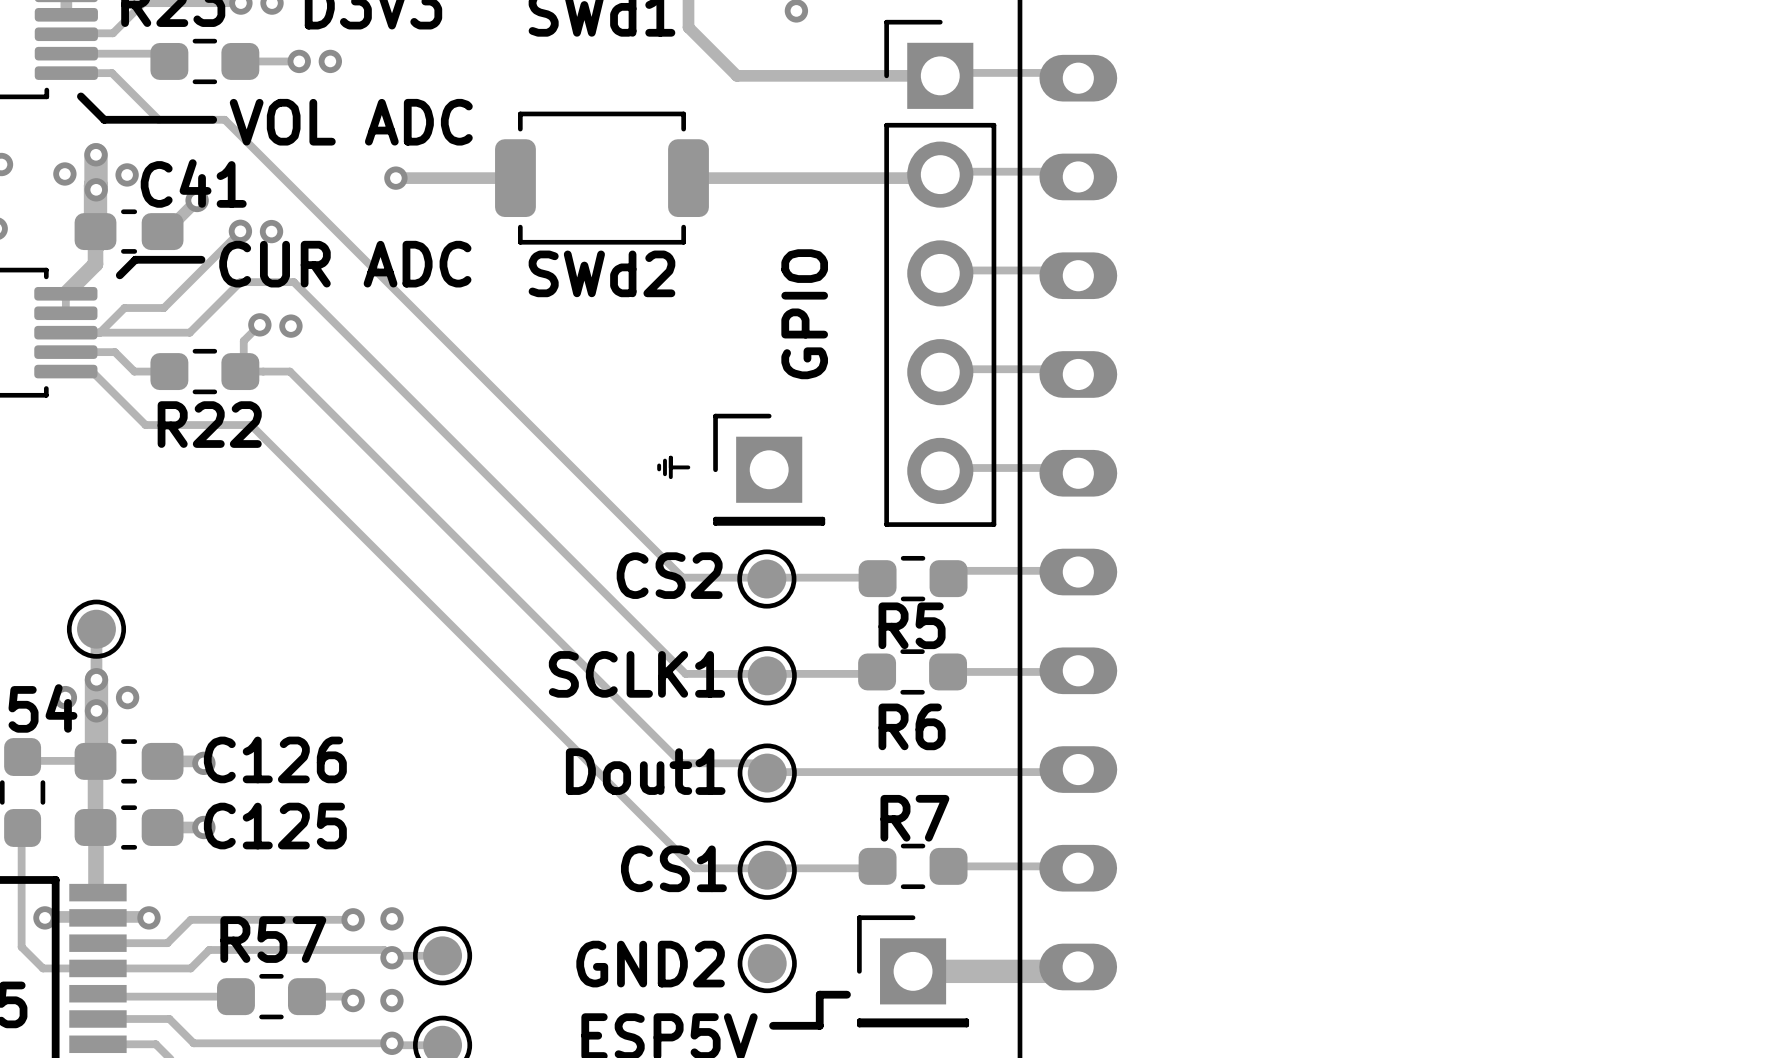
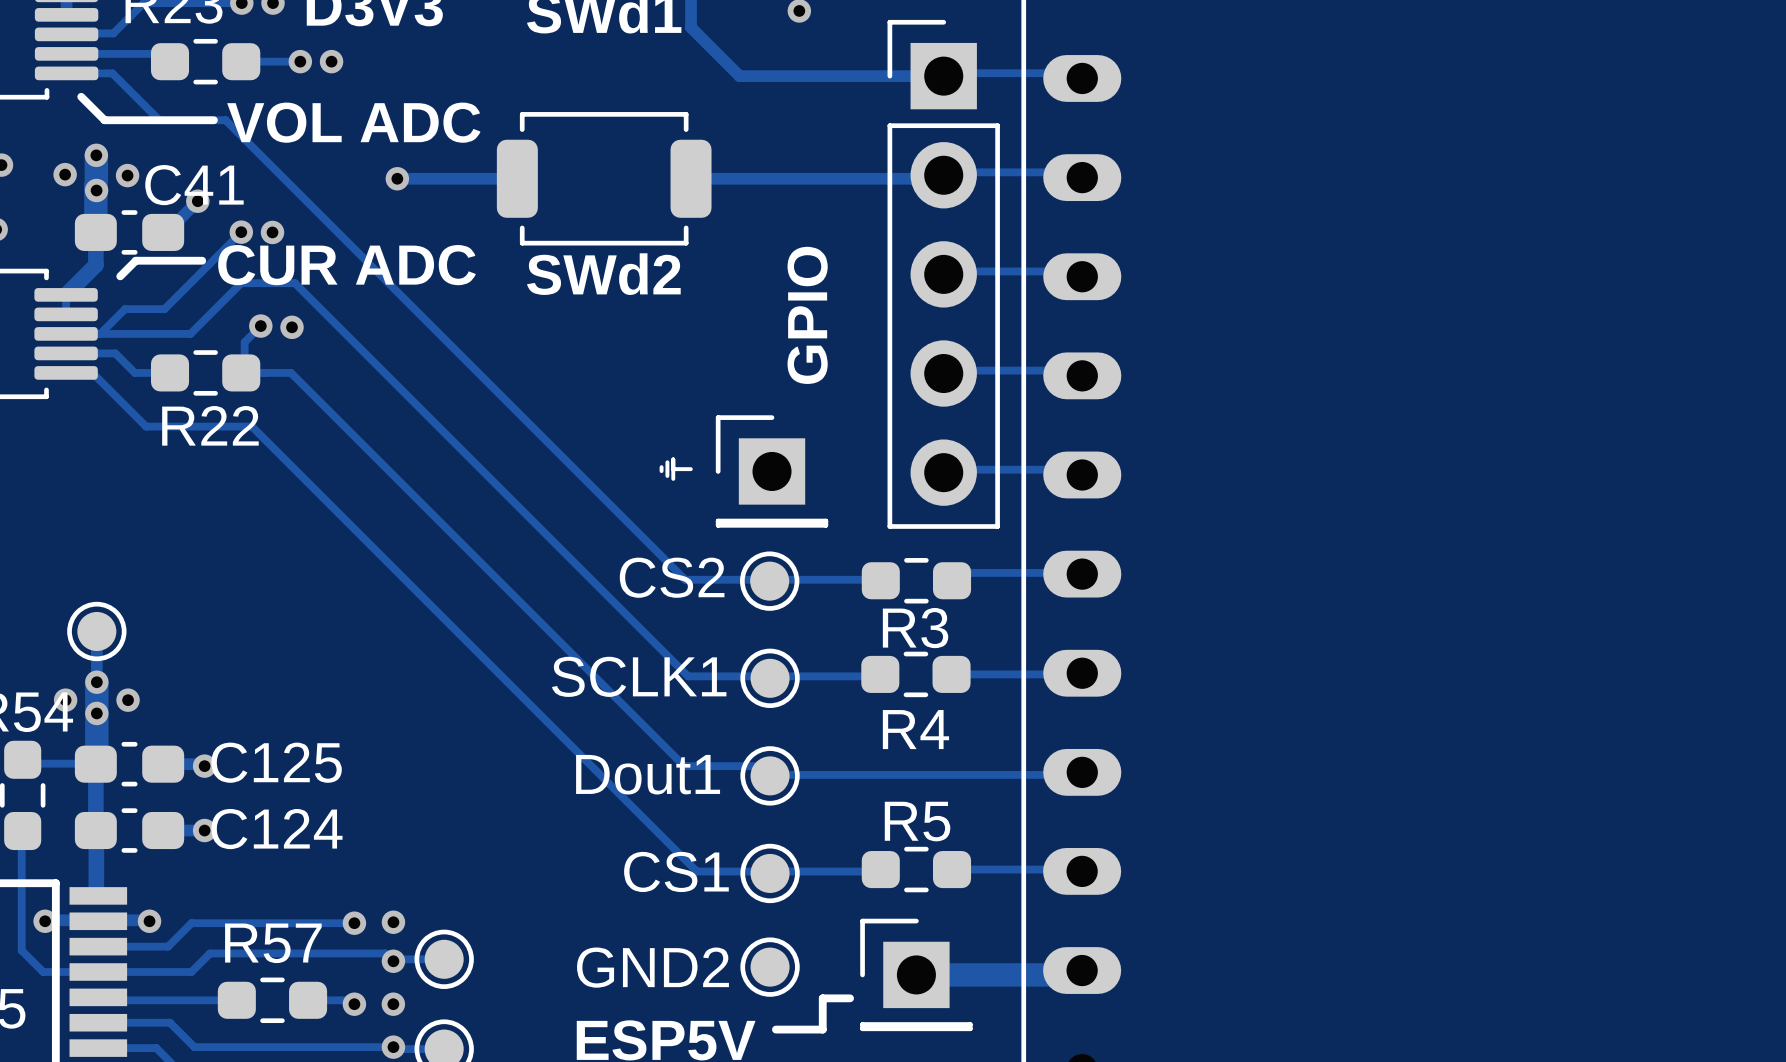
R5 name: R5 (912, 625) -> R3 (915, 628)
R6 name: R6 (912, 726) -> R4 (915, 729)
C126 name: C126 (275, 759) -> C125 (276, 762)
R7 name: R7 (914, 818) -> R5 (917, 821)
C125 name: C125 (275, 826) -> C124 (276, 829)

